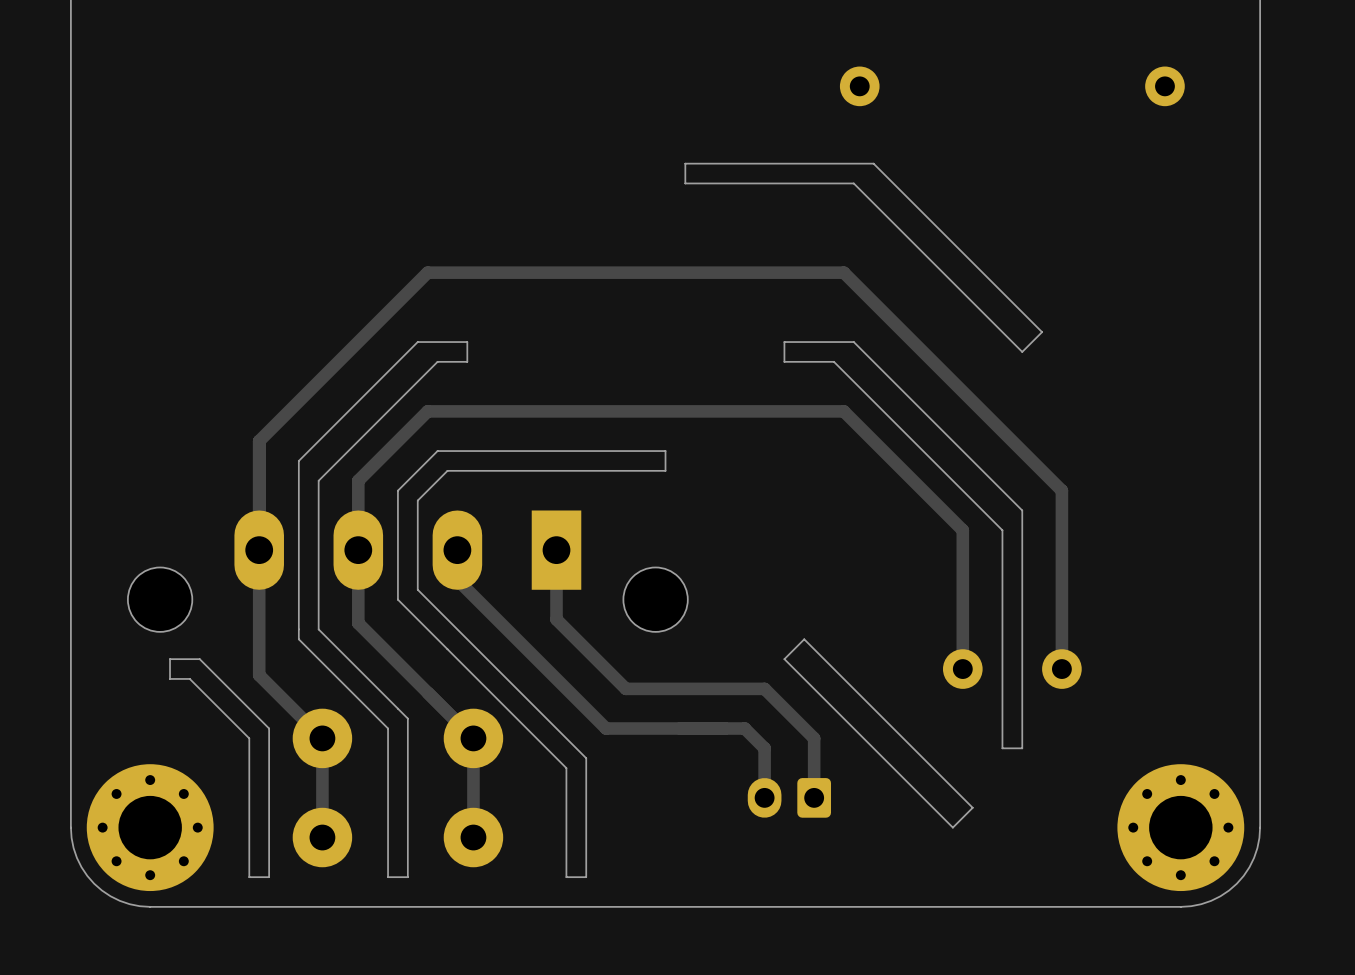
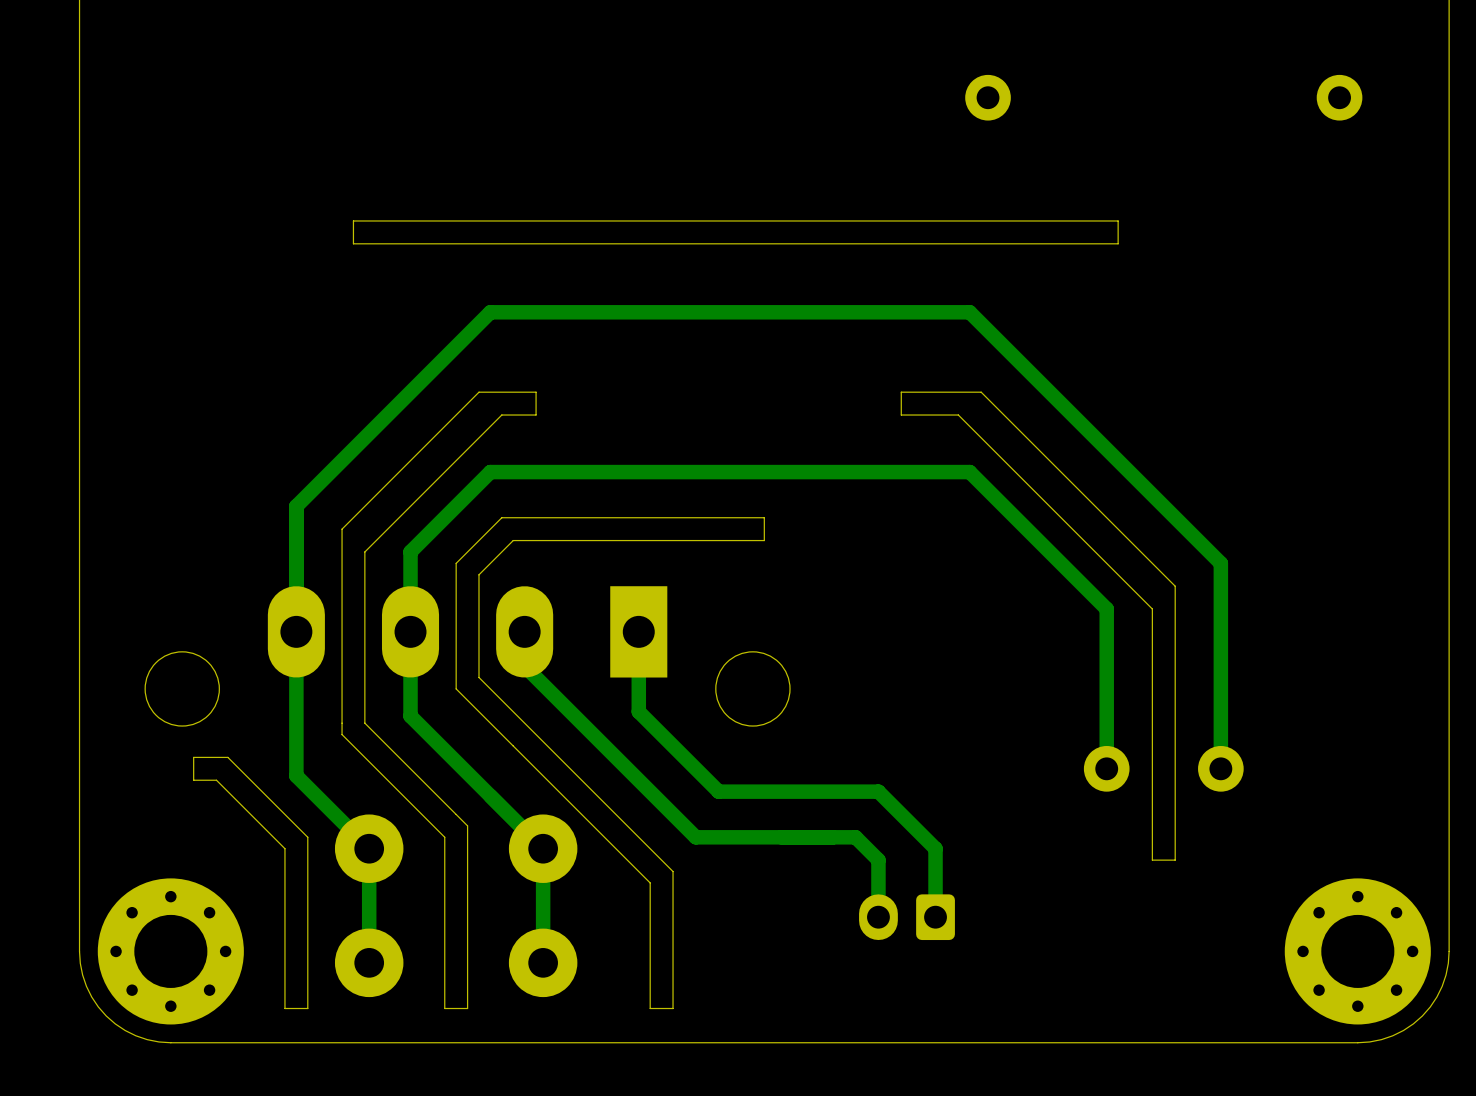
board edge: (873, 163) (685, 163) (685, 183) (853, 183) (1022, 351) (1042, 332) (873, 163) -> none
board edge: none -> (1118, 220) (353, 220) (353, 243) (1118, 243) (1118, 220)
board edge: (804, 639) (784, 659) (952, 827) (972, 807) (804, 639) -> none

